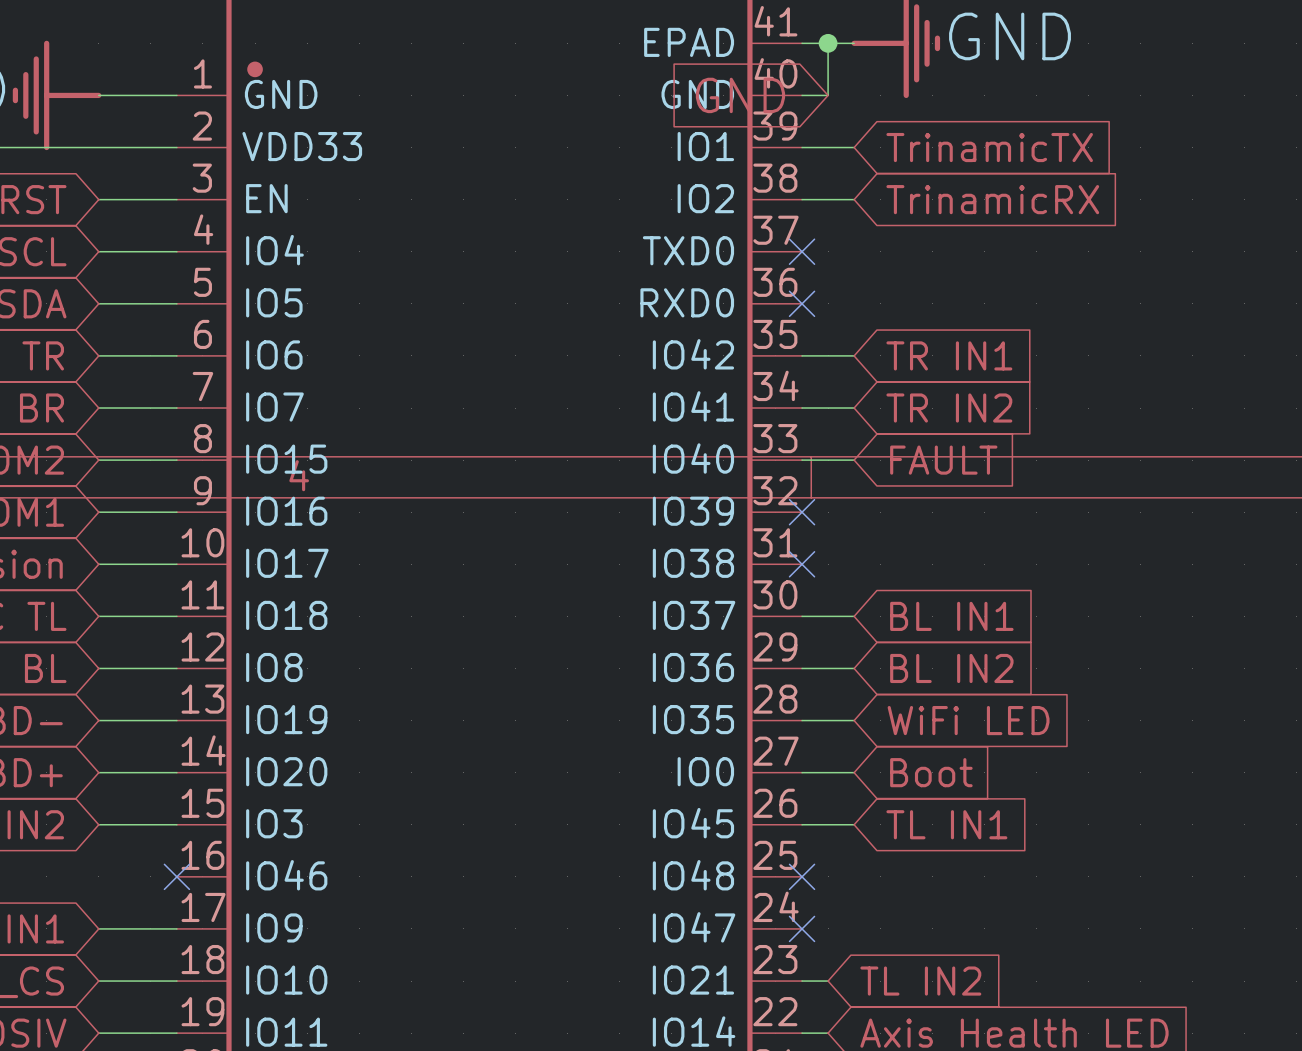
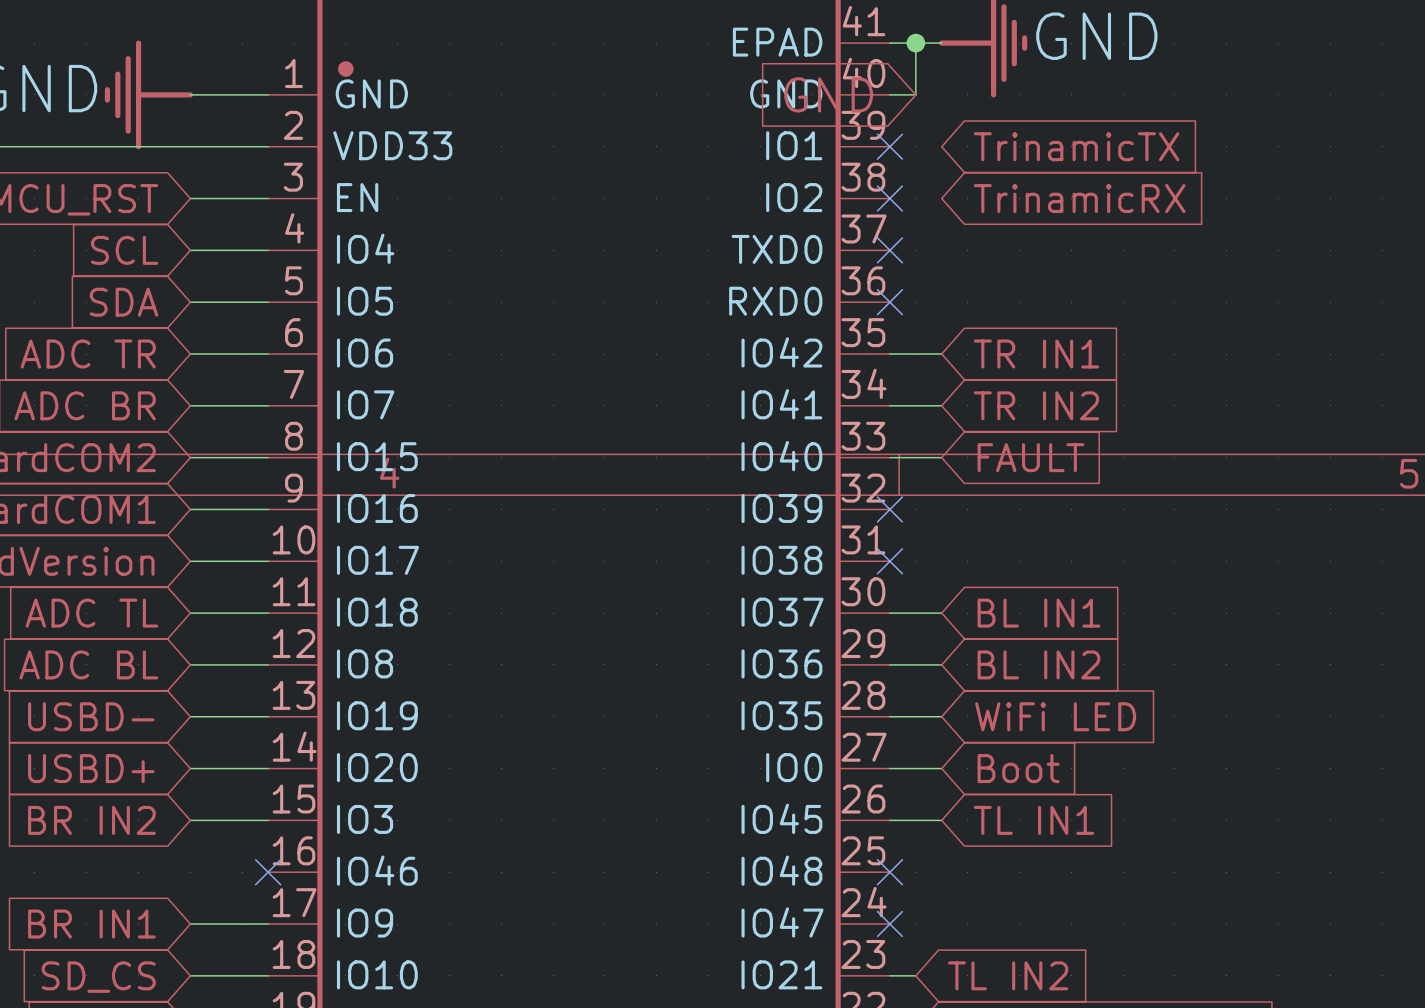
wire: (802, 147) (854, 147) -> none
no-connect mark: none -> (889, 146)
wire: (802, 199) (854, 199) -> none
no-connect mark: none -> (889, 198)

